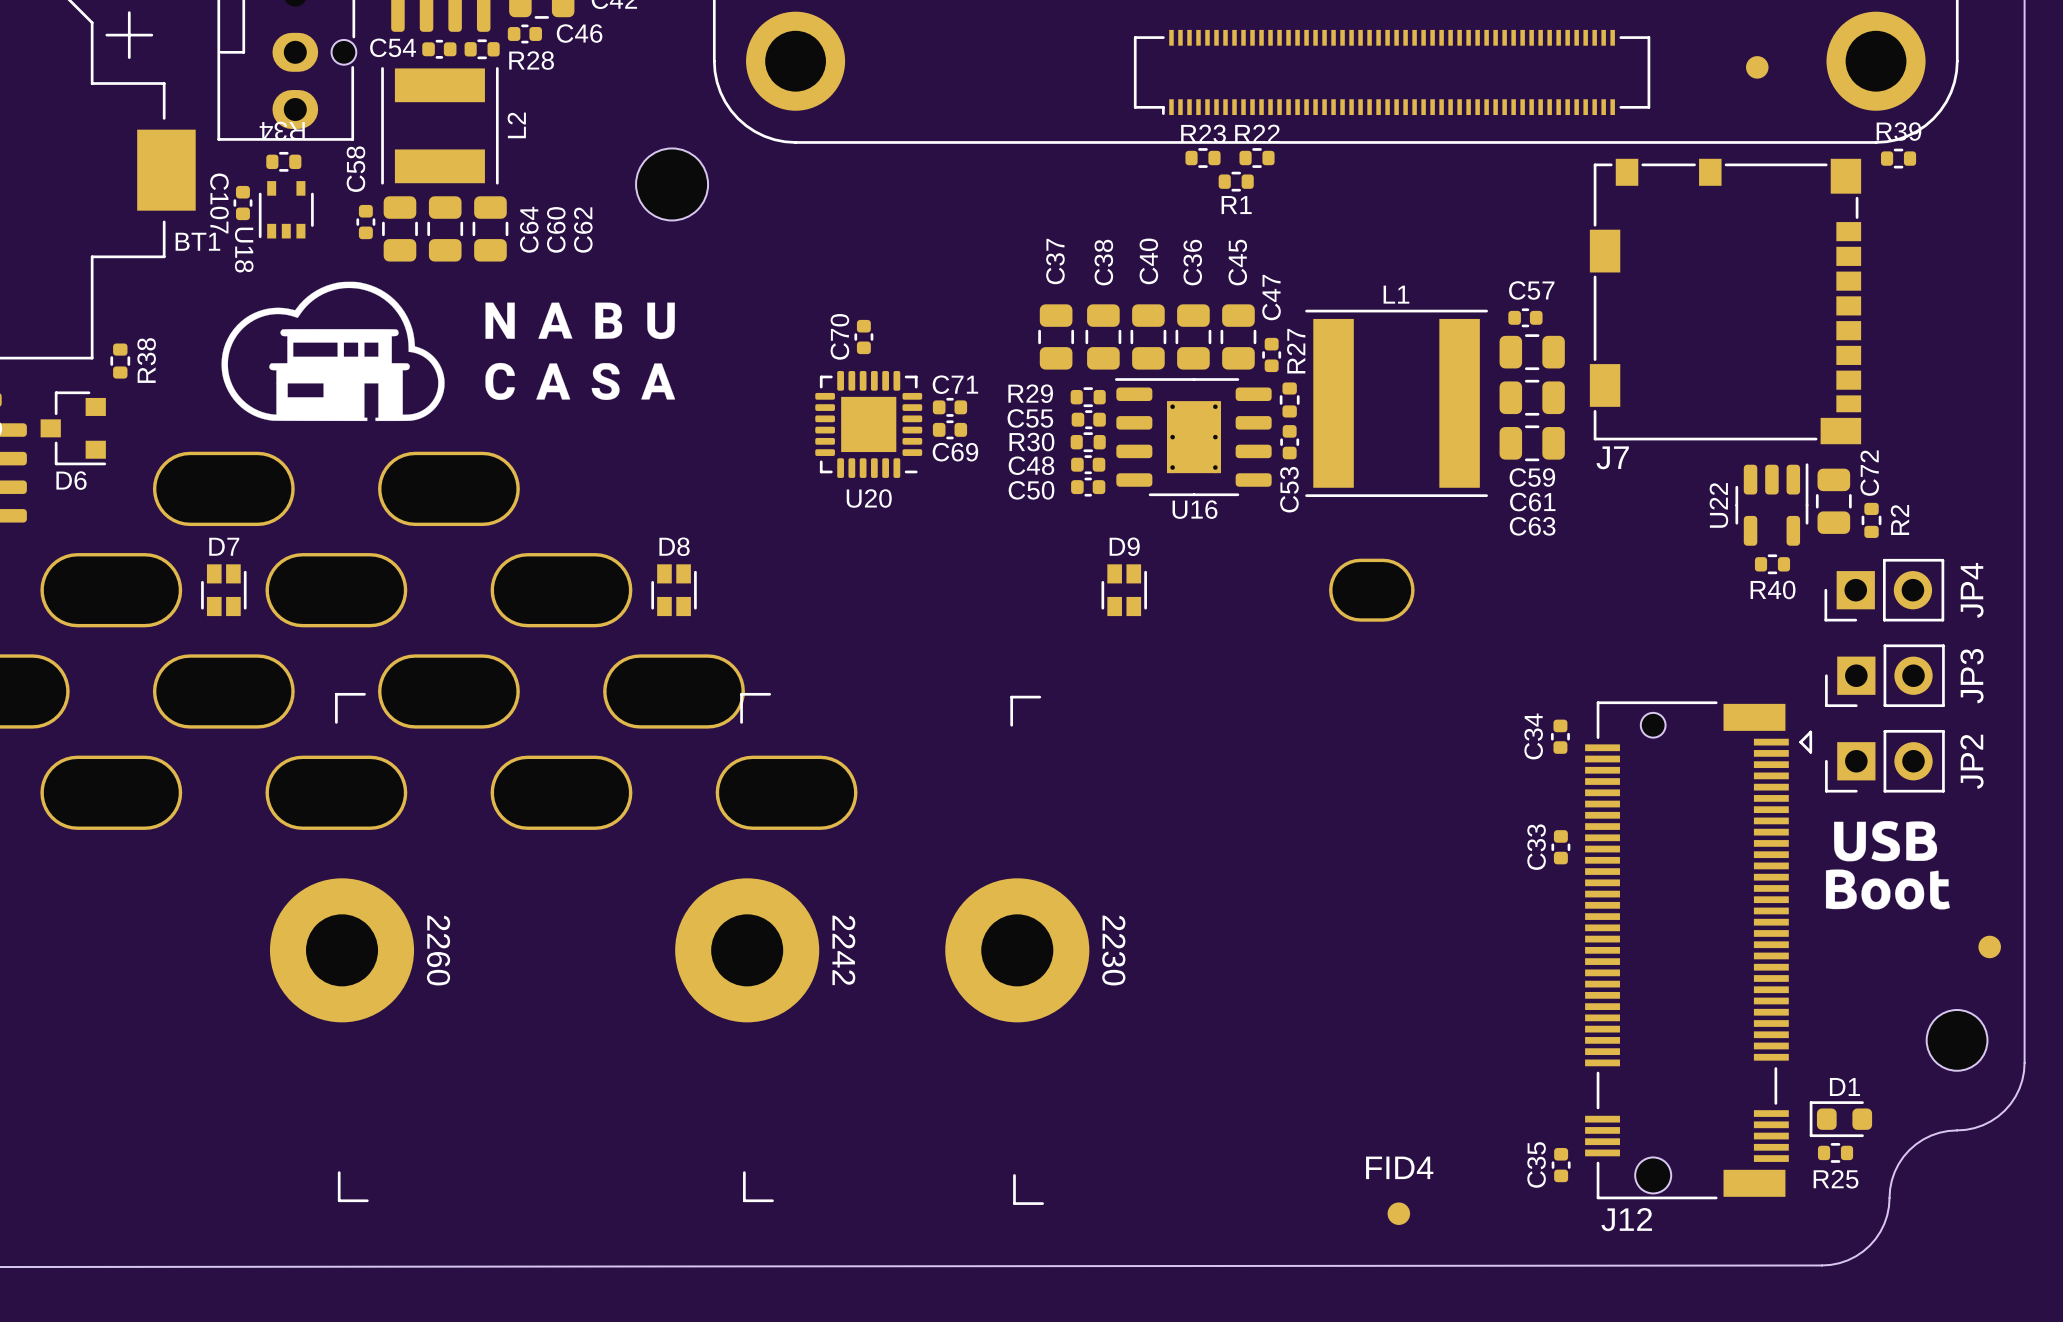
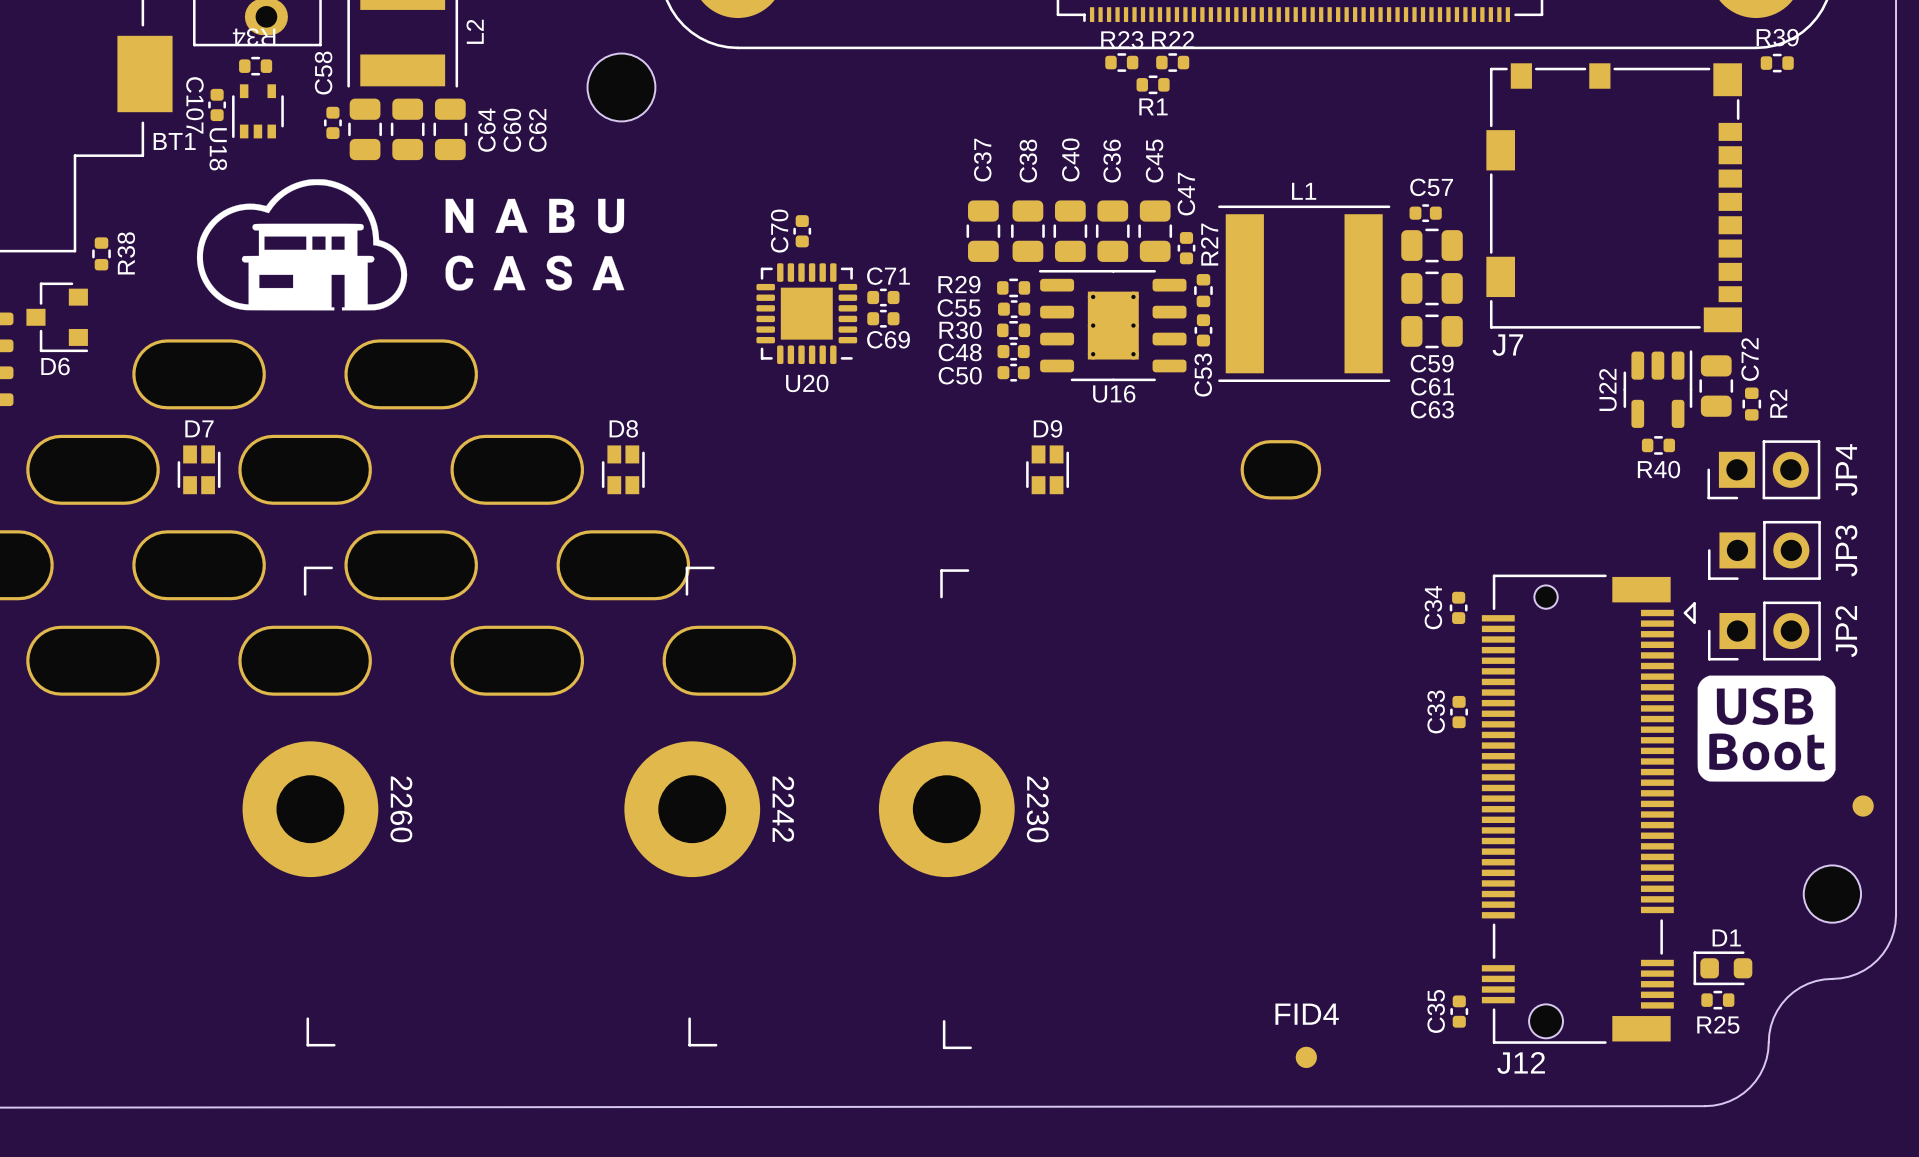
drawing shape: [1825, 821, 1950, 910] -> [1697, 675, 1836, 782]

